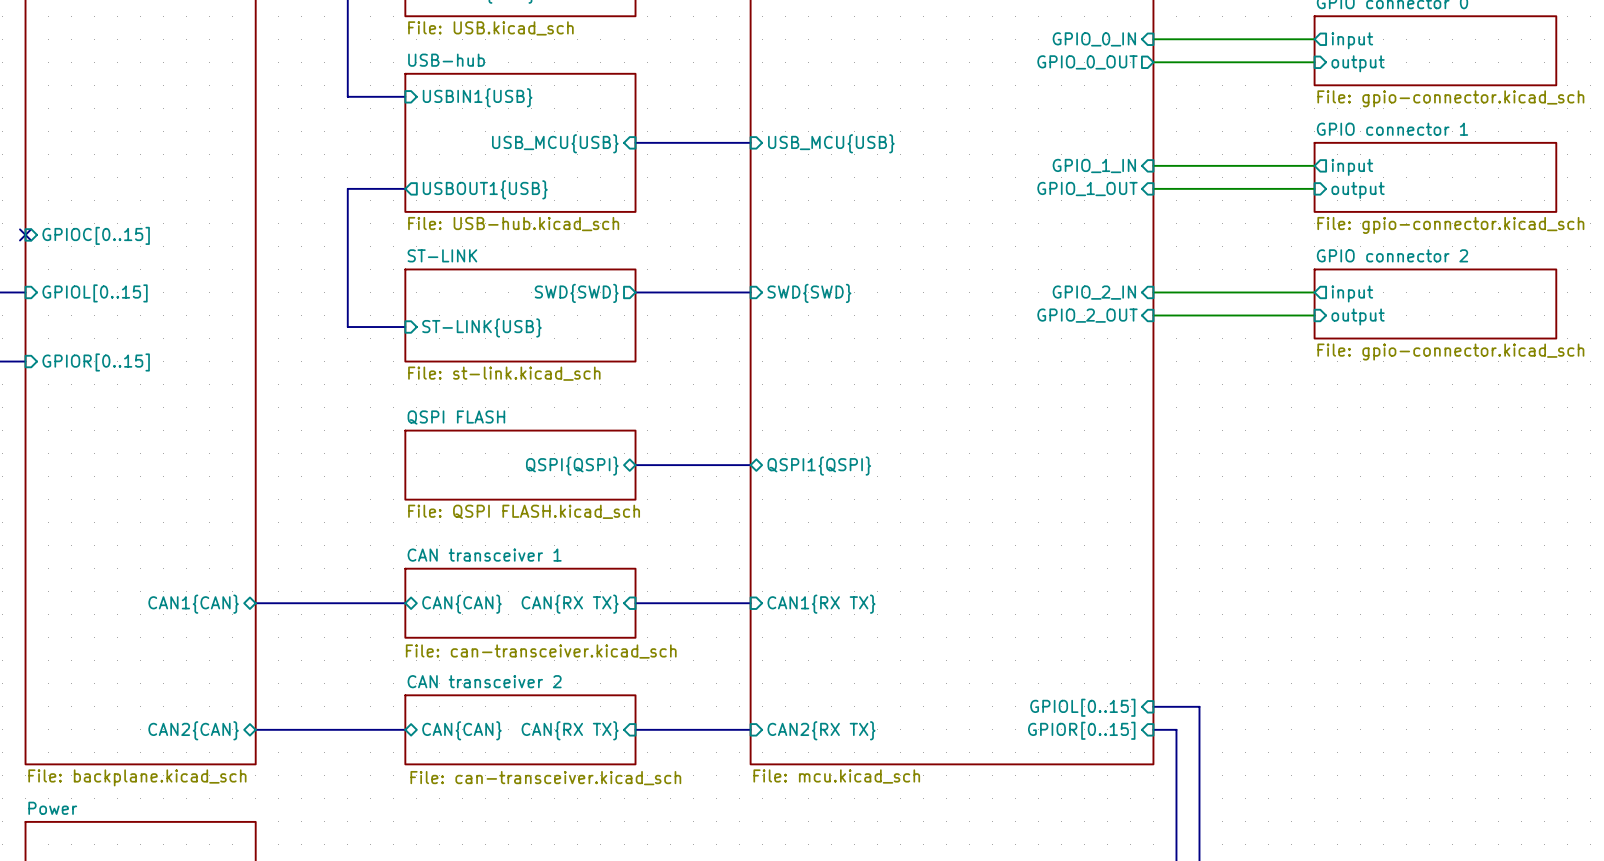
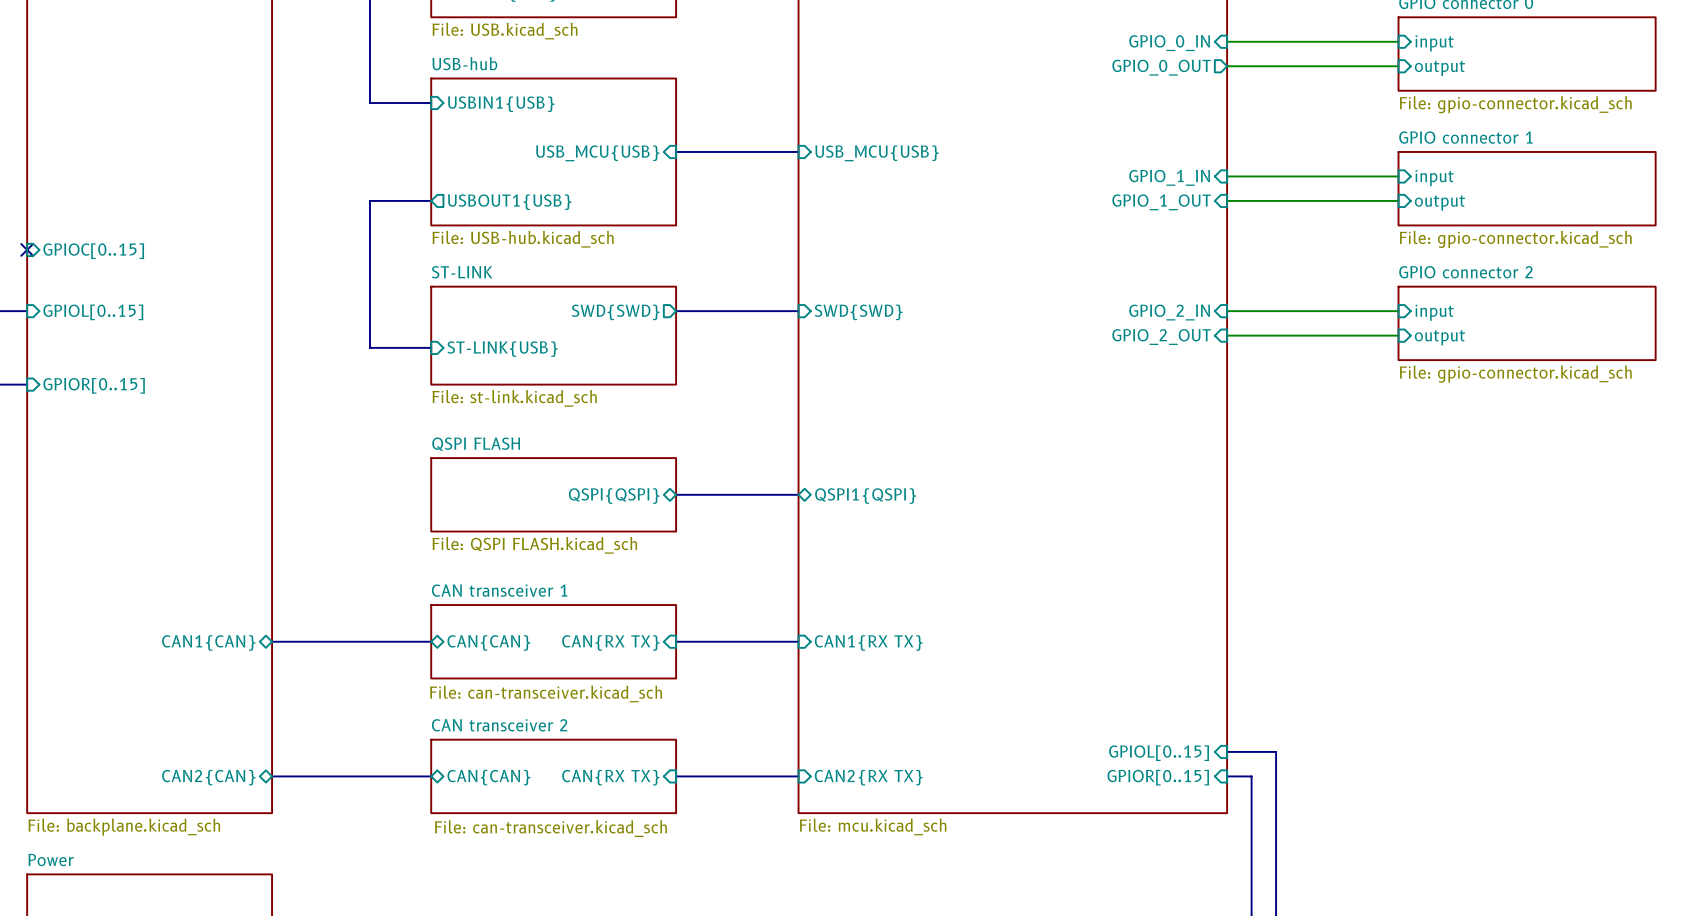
sheet pin shape: output (1352, 40) -> input (1434, 43)
sheet pin shape: output (1352, 167) -> input (1434, 178)
sheet pin shape: output (1352, 293) -> input (1434, 312)

